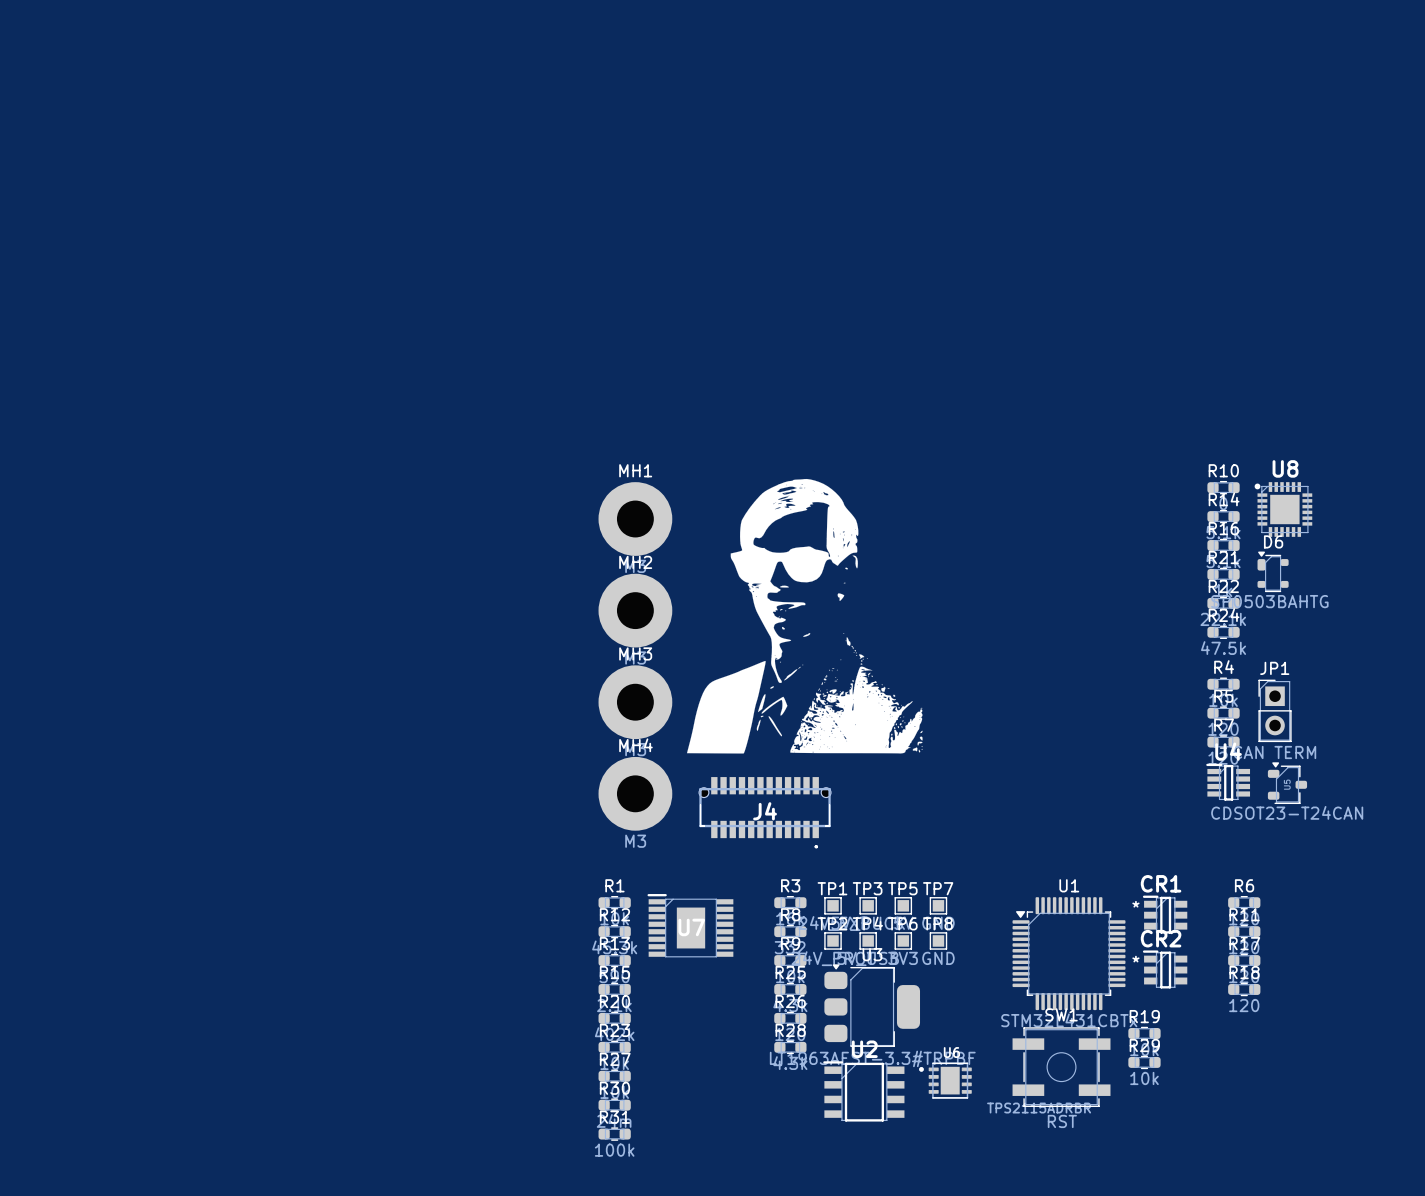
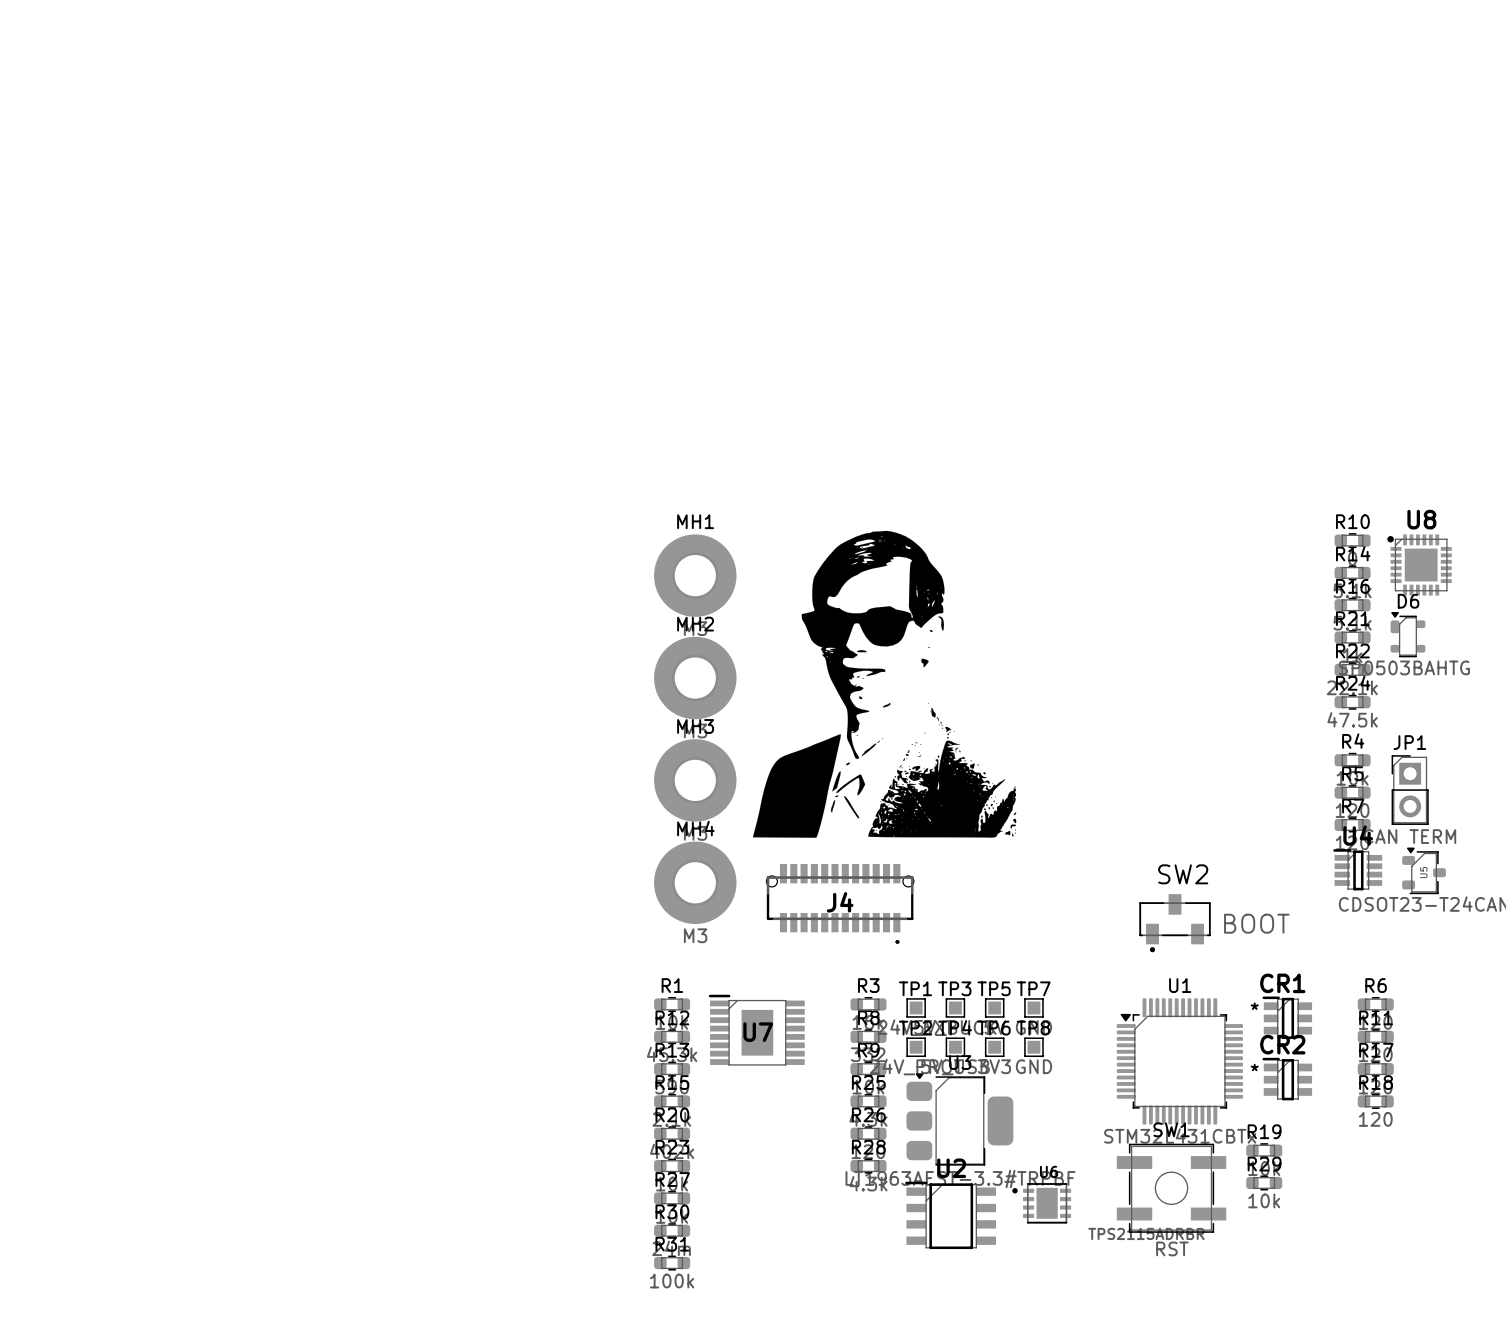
SW2: none -> BOOT (1175, 923)

